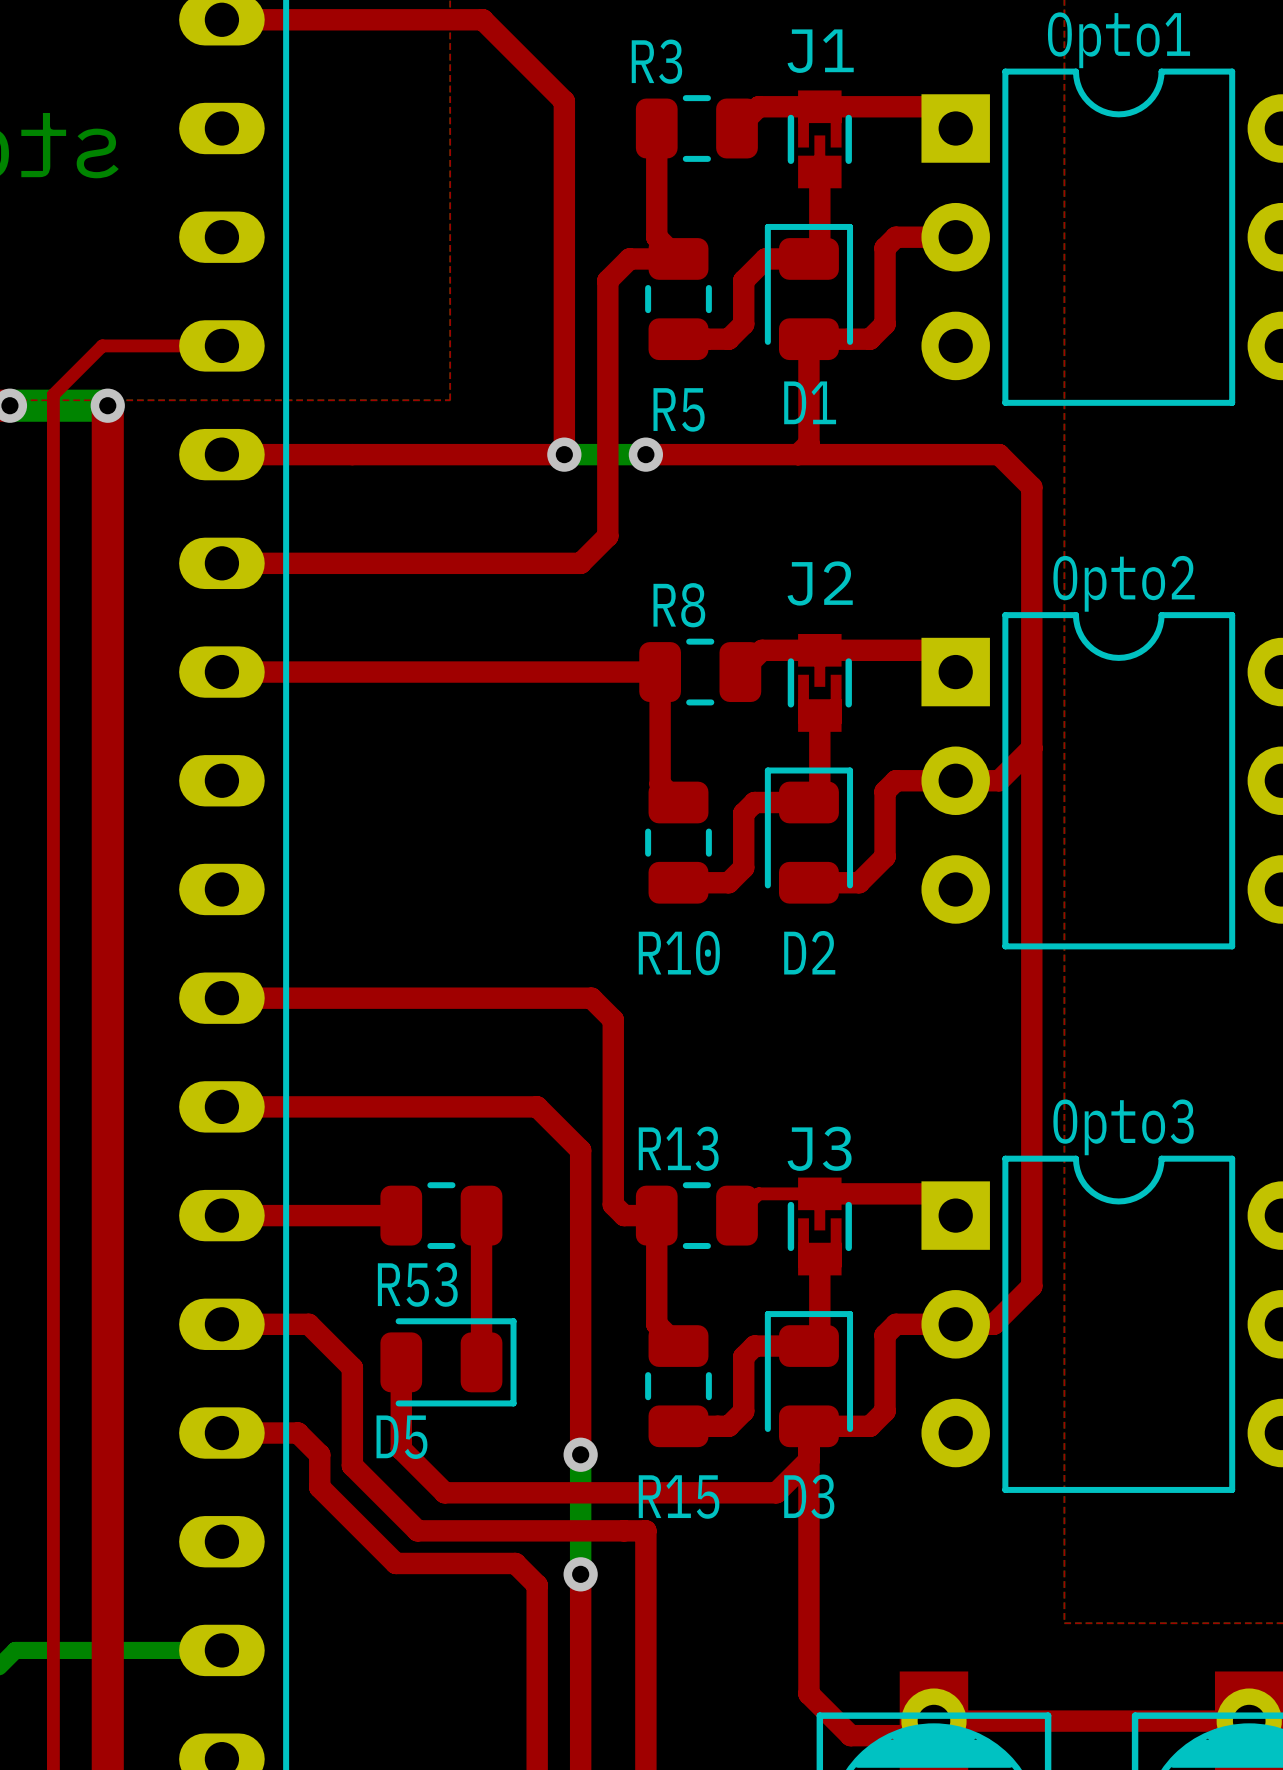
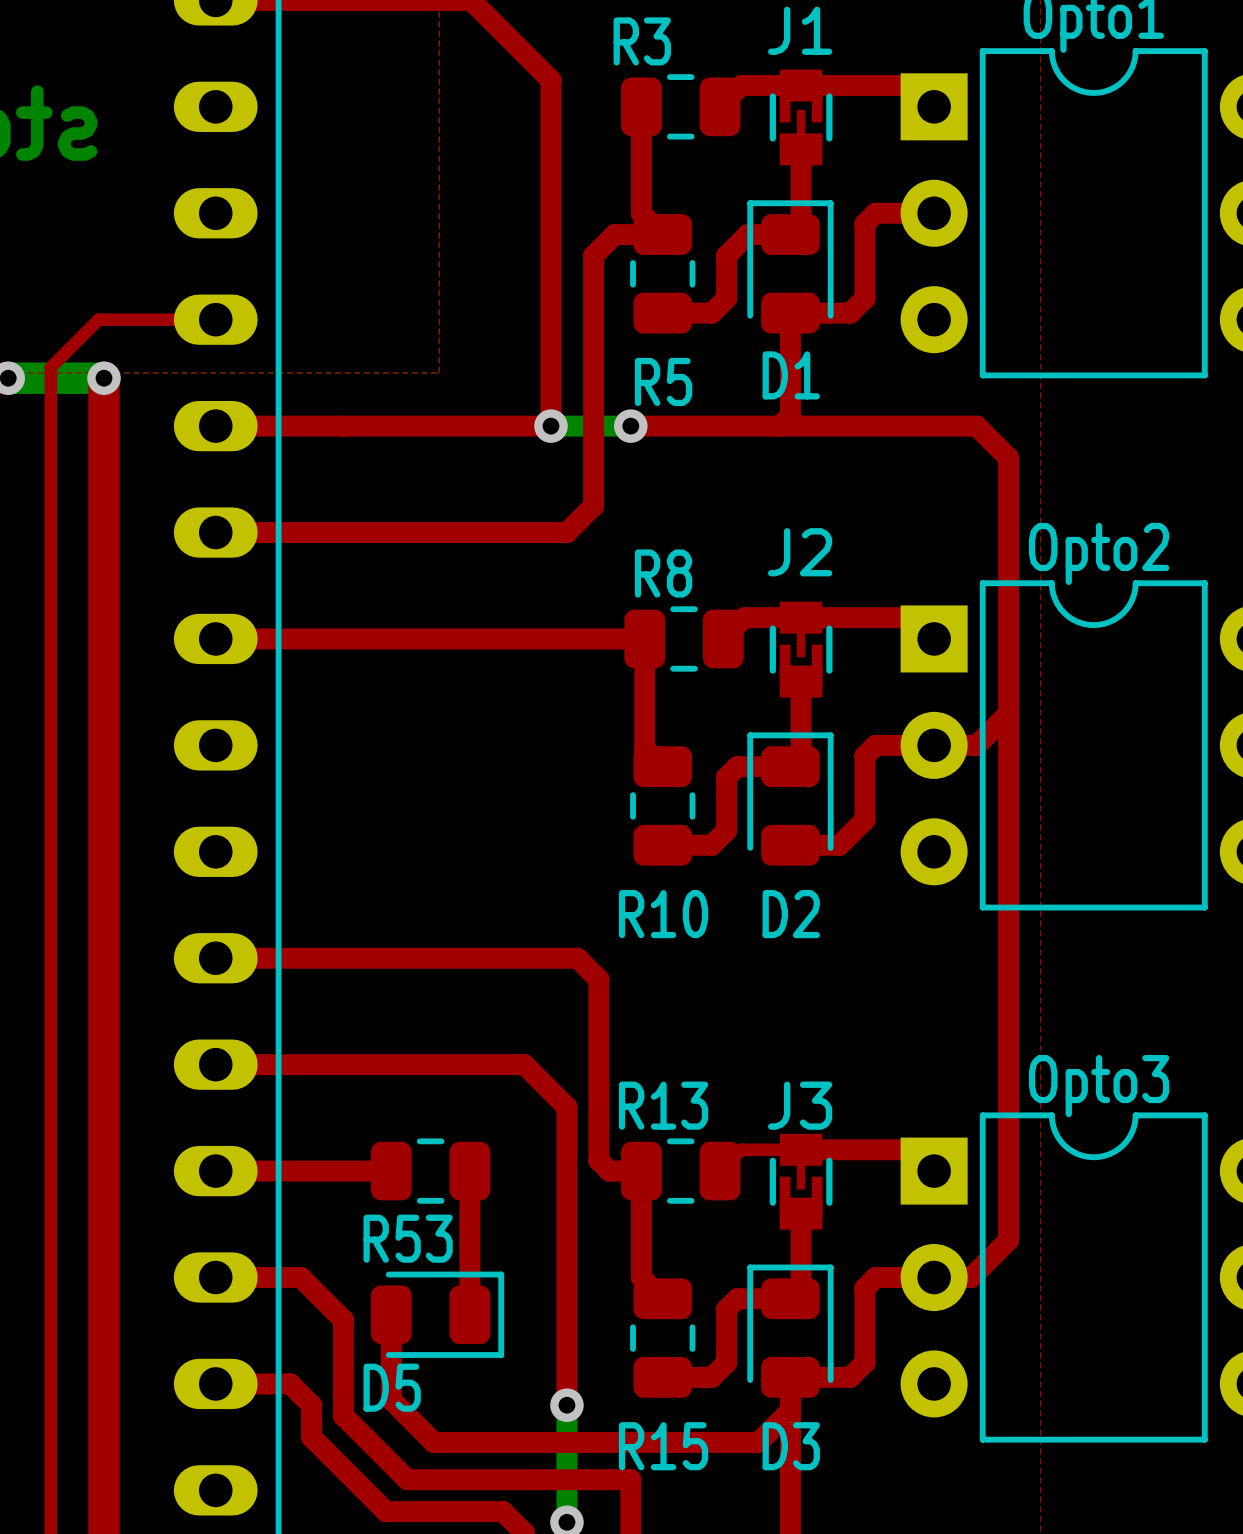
J1 footprint: [787, 90, 852, 189] -> [769, 69, 833, 166]
J2 footprint: [787, 634, 852, 732] -> [769, 601, 833, 698]
J3 footprint: [787, 1177, 852, 1276] -> [769, 1133, 833, 1230]

